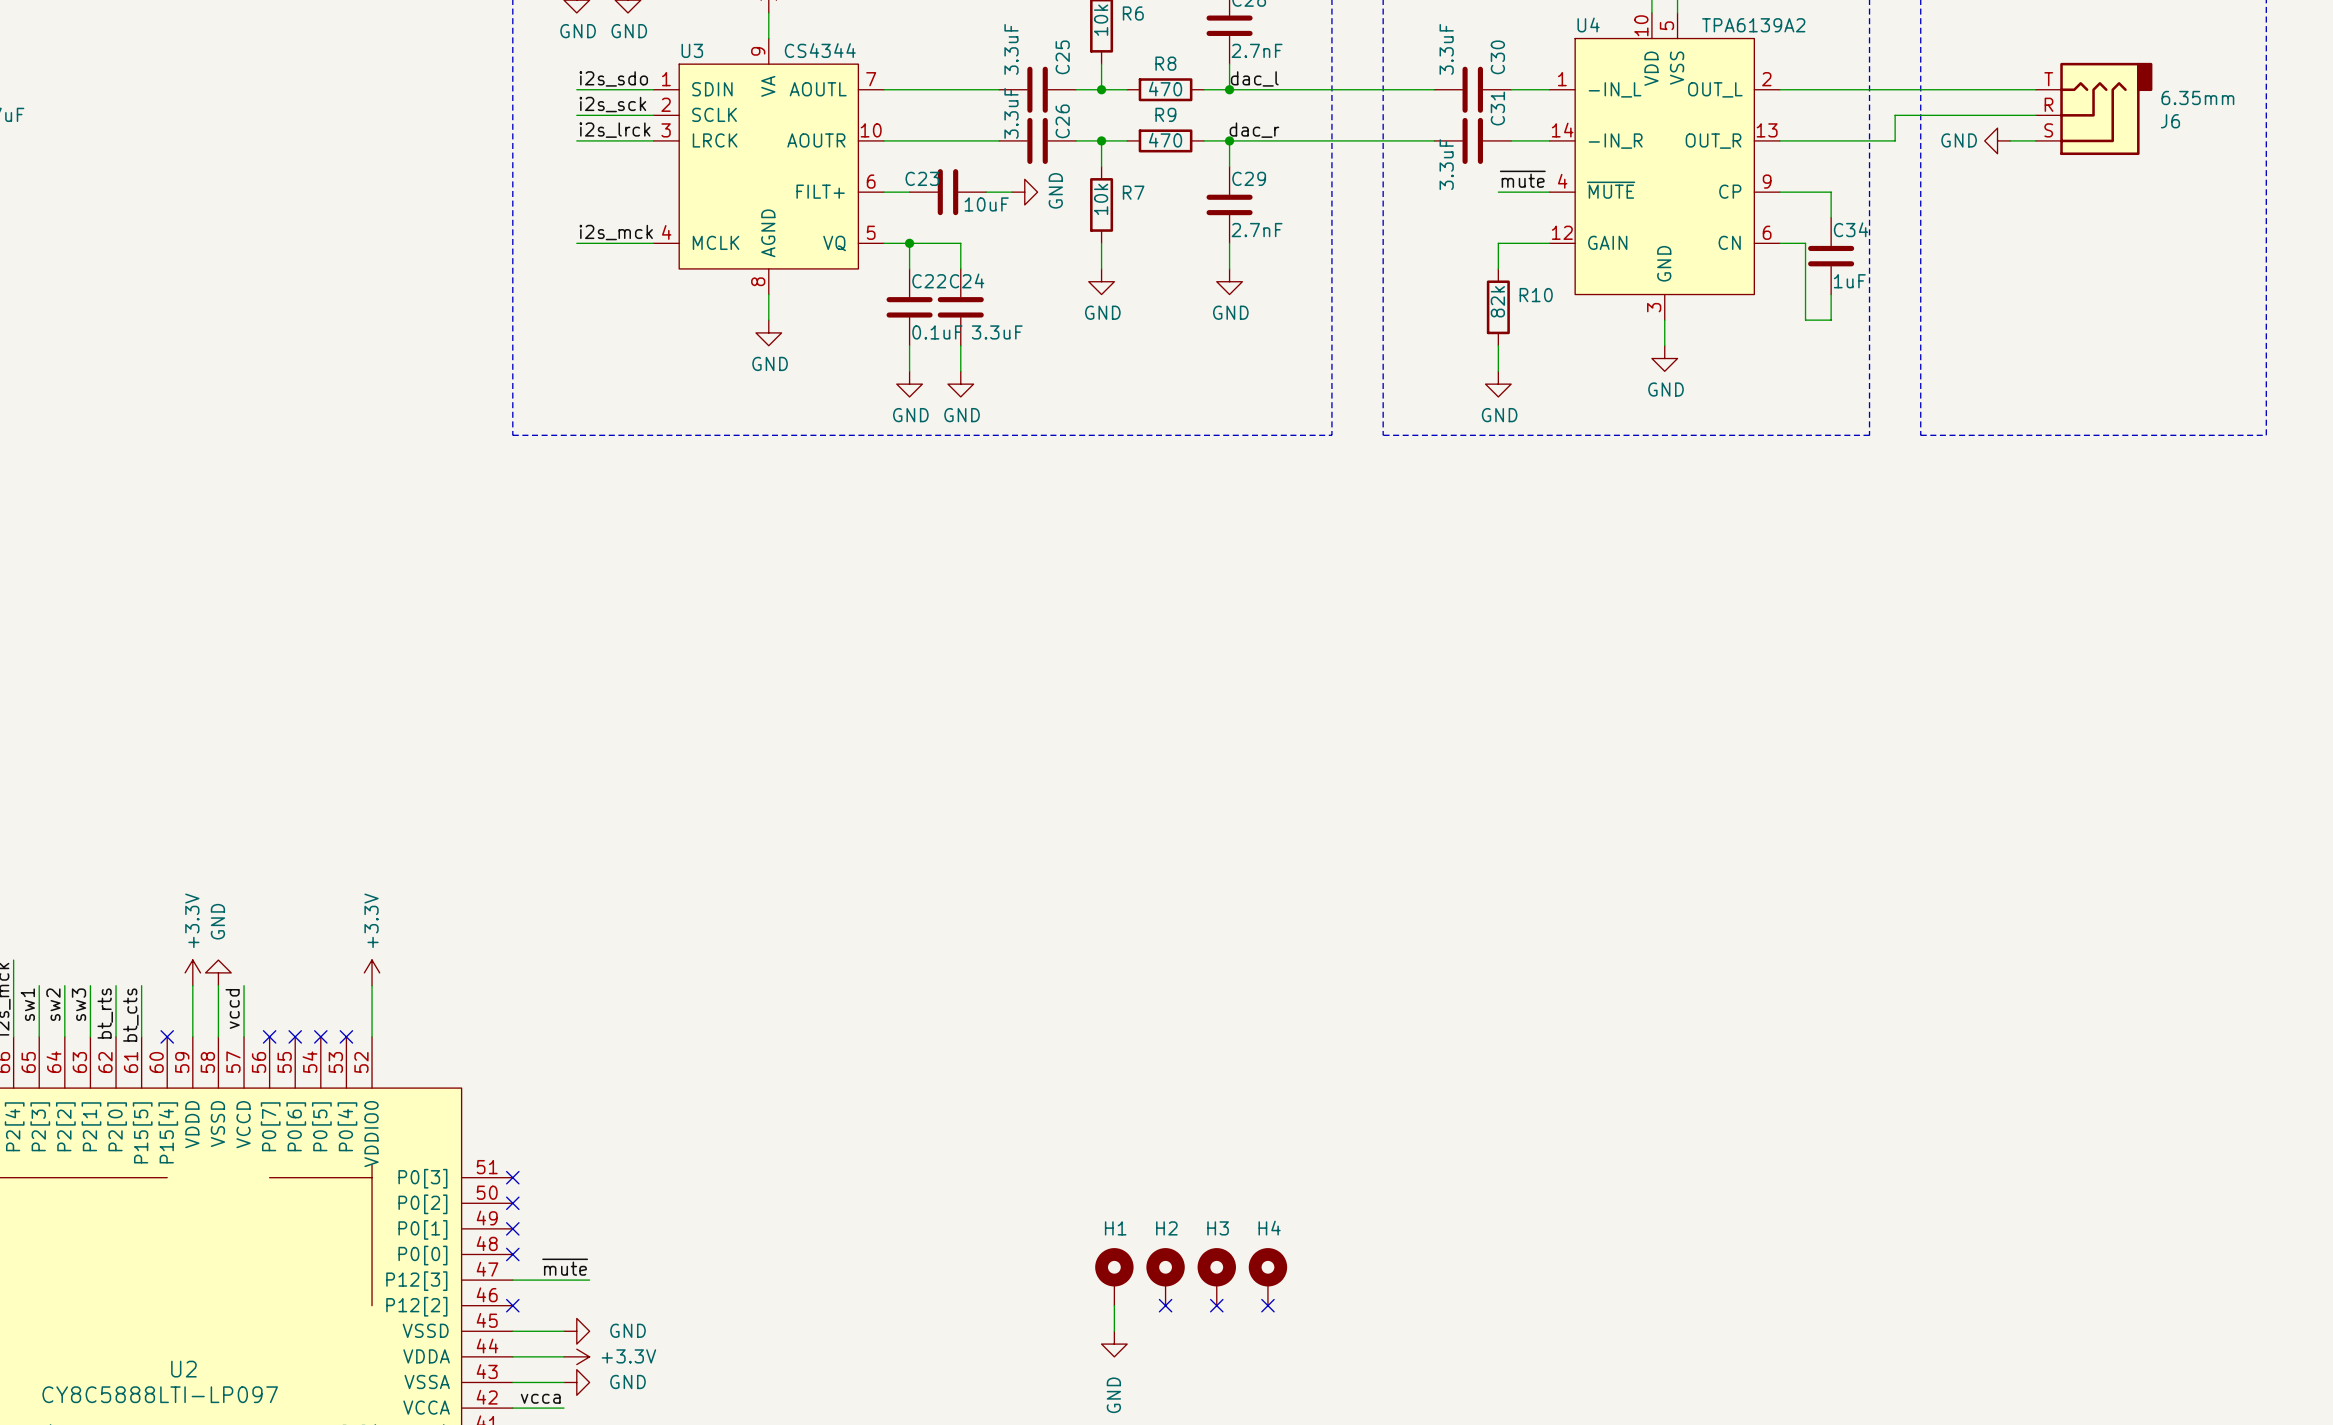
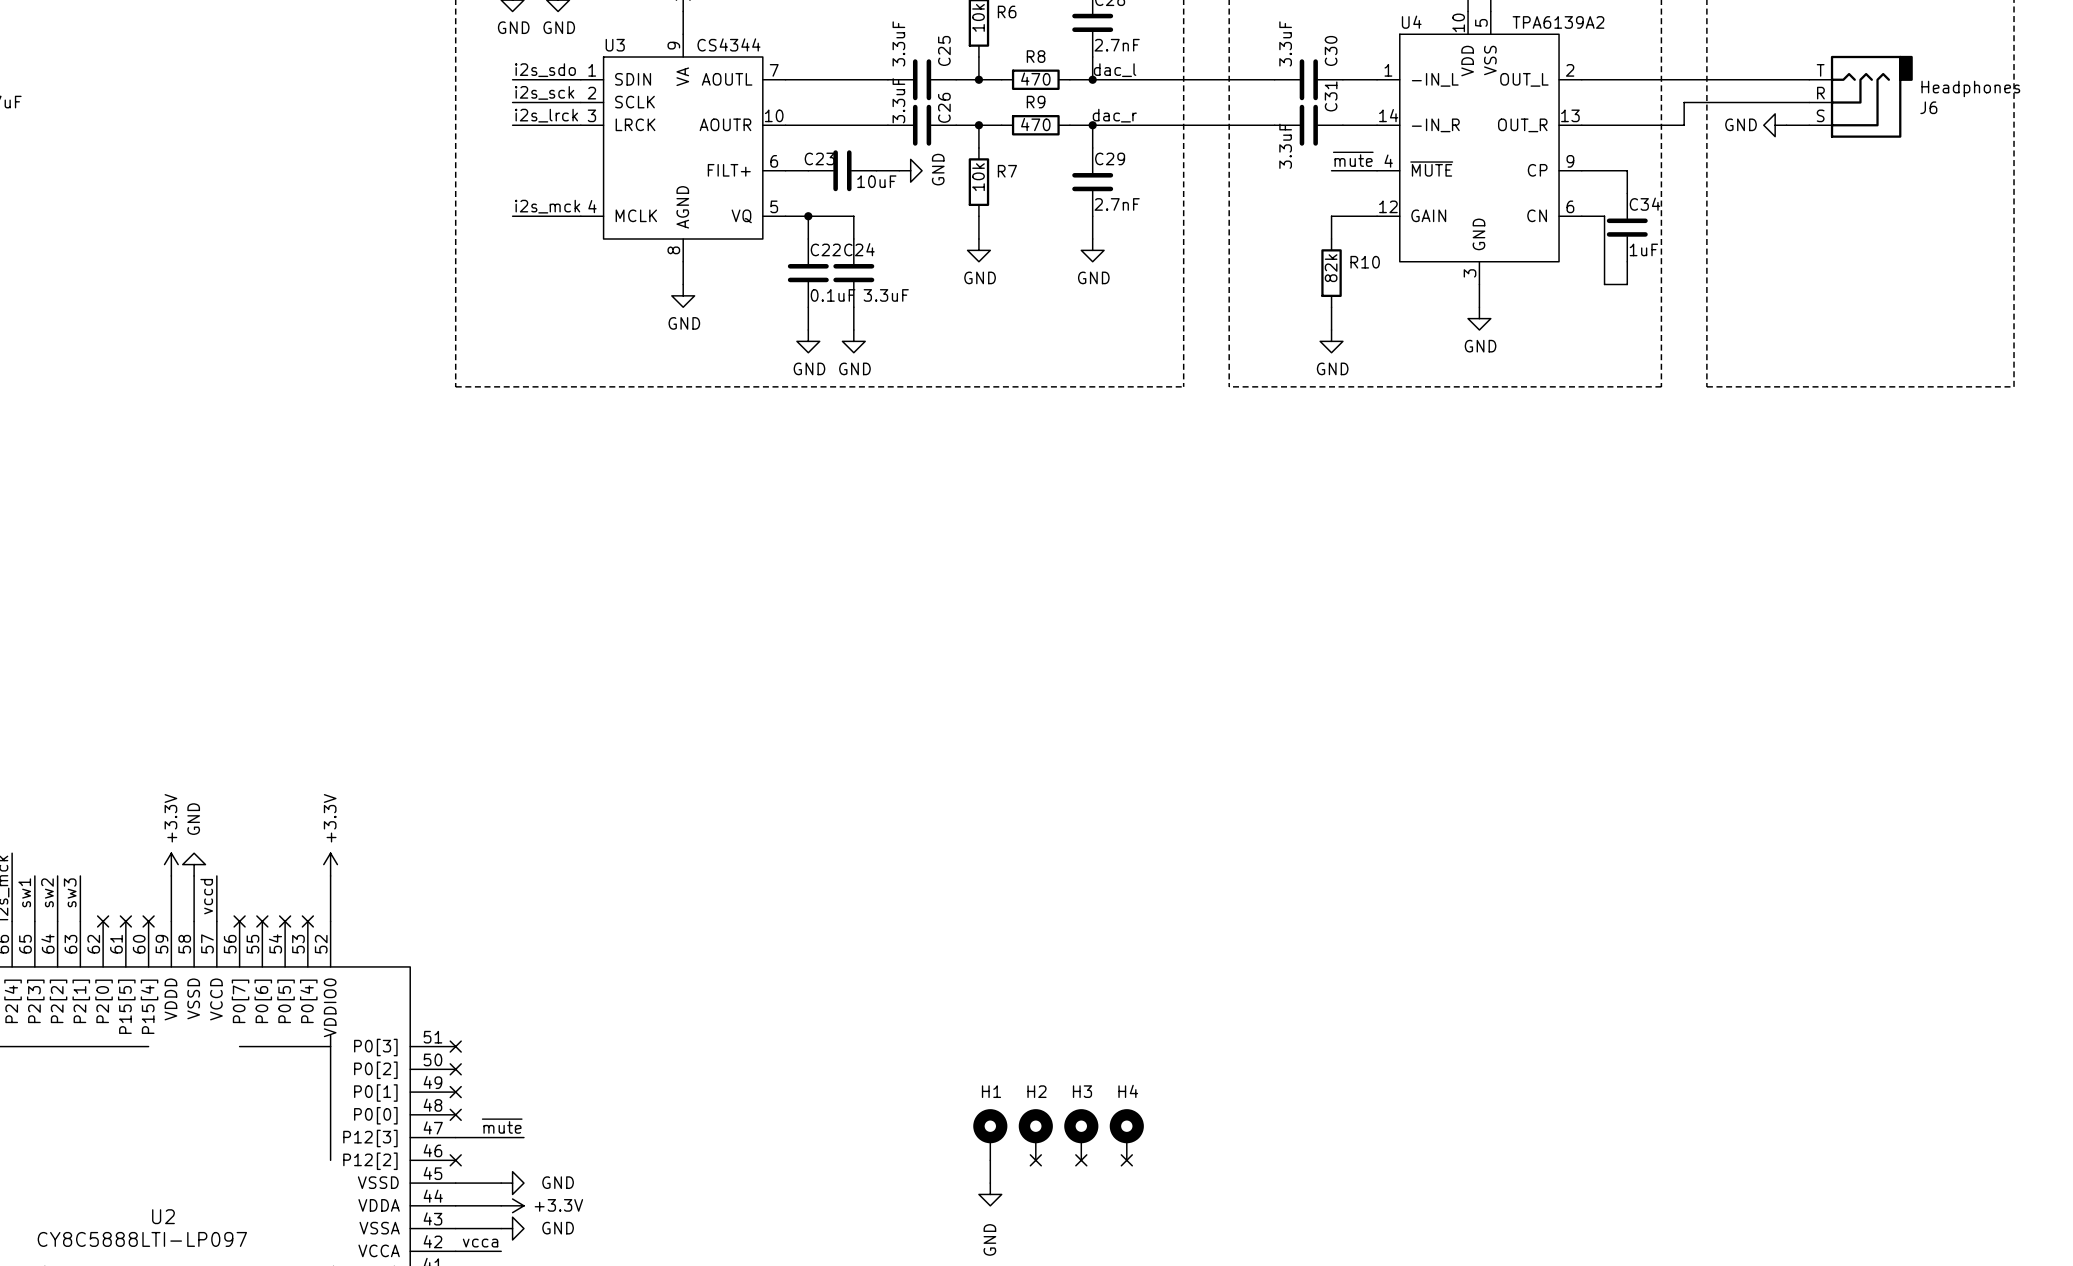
J6 value: 6.35mm (2197, 97) -> Headphones (1970, 88)
wire: (116, 985) (116, 1036) -> none
wire: (141, 985) (141, 1036) -> none
label: bt_rts (105, 1013) -> none
label: bt_cts (130, 1015) -> none
no-connect mark: none -> (103, 921)
no-connect mark: none -> (125, 921)

